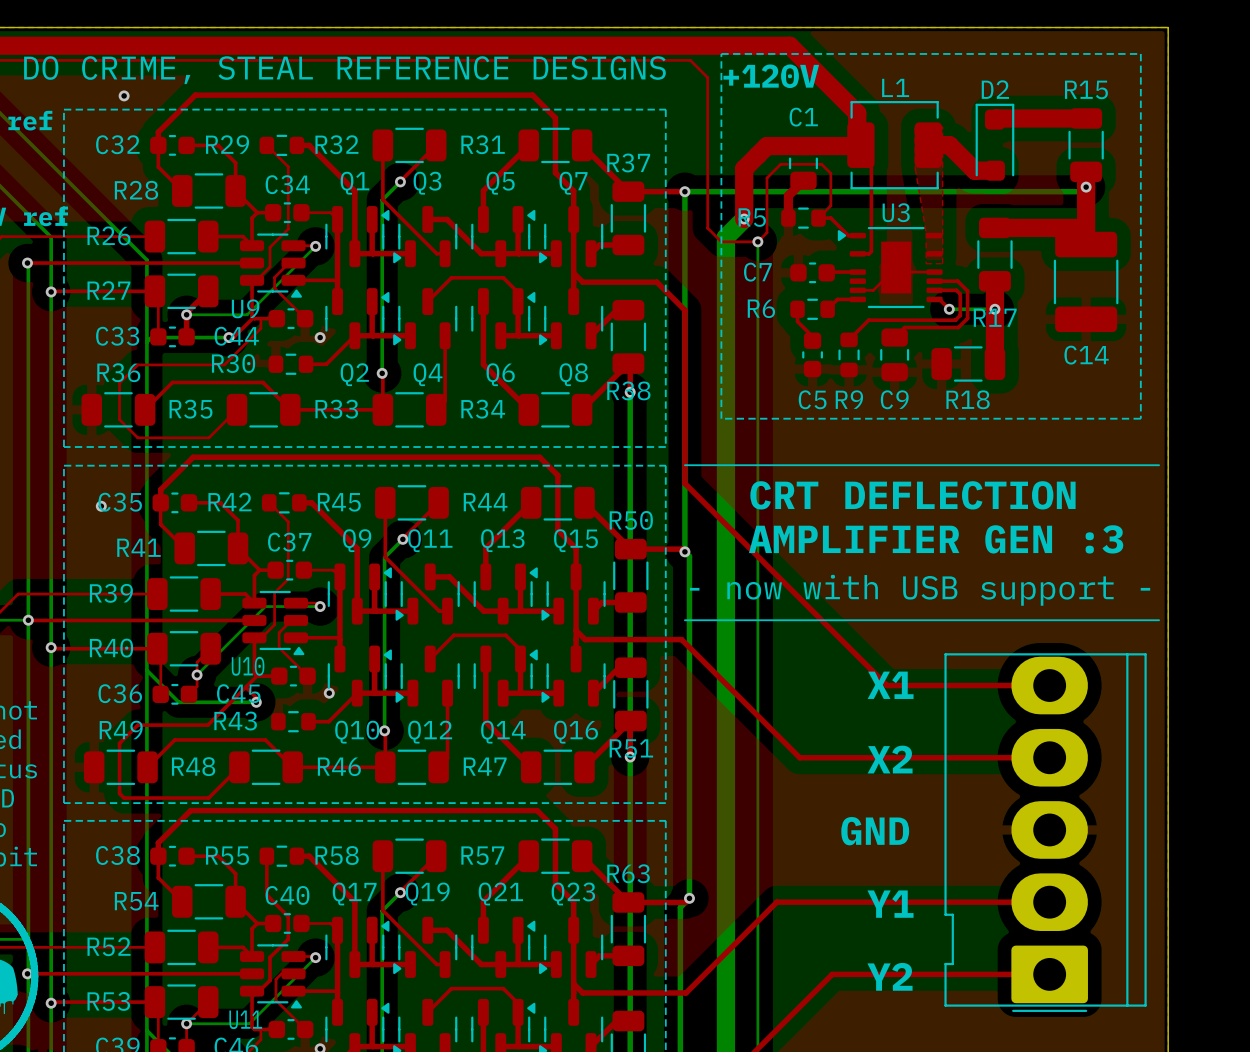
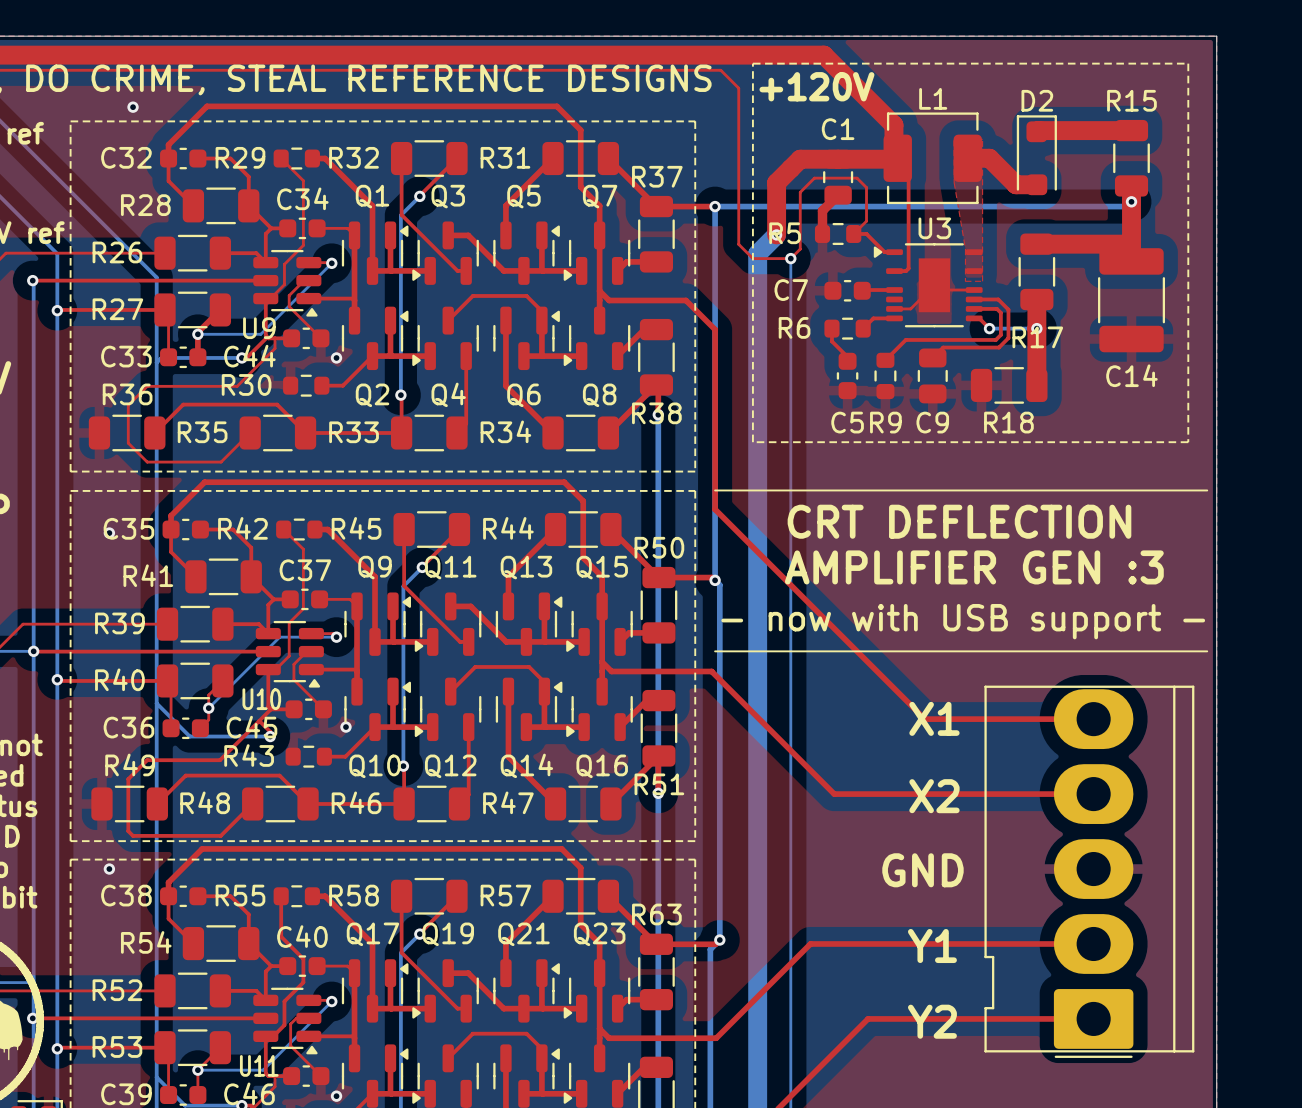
via: none -> (109, 869)

